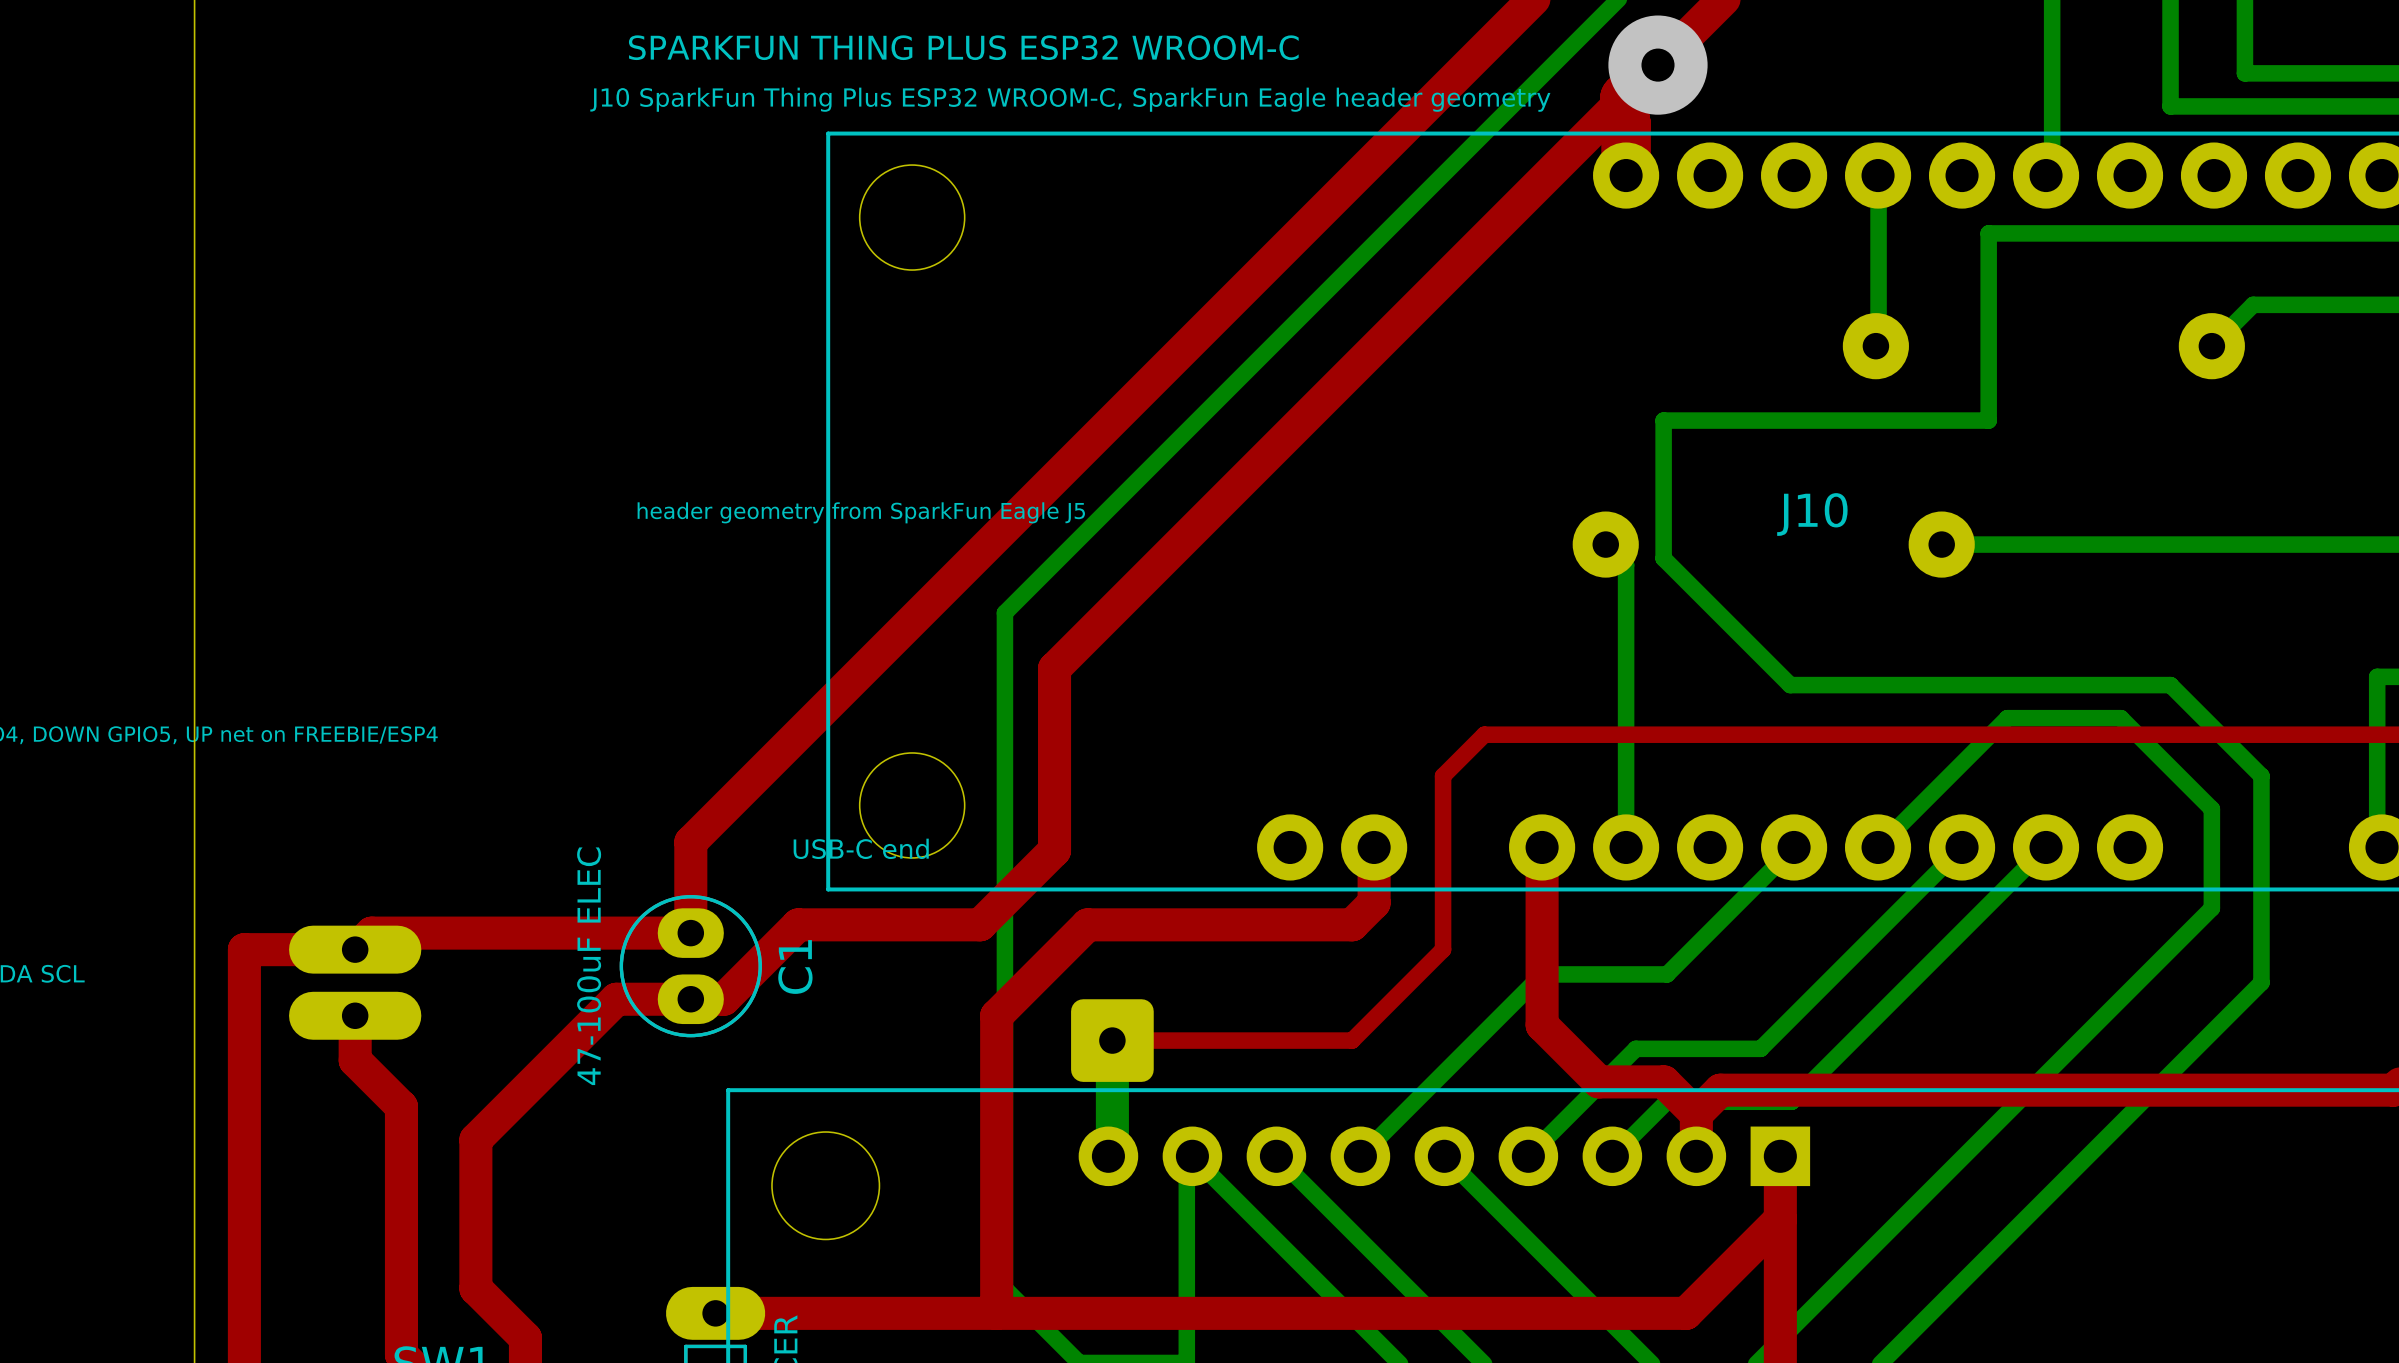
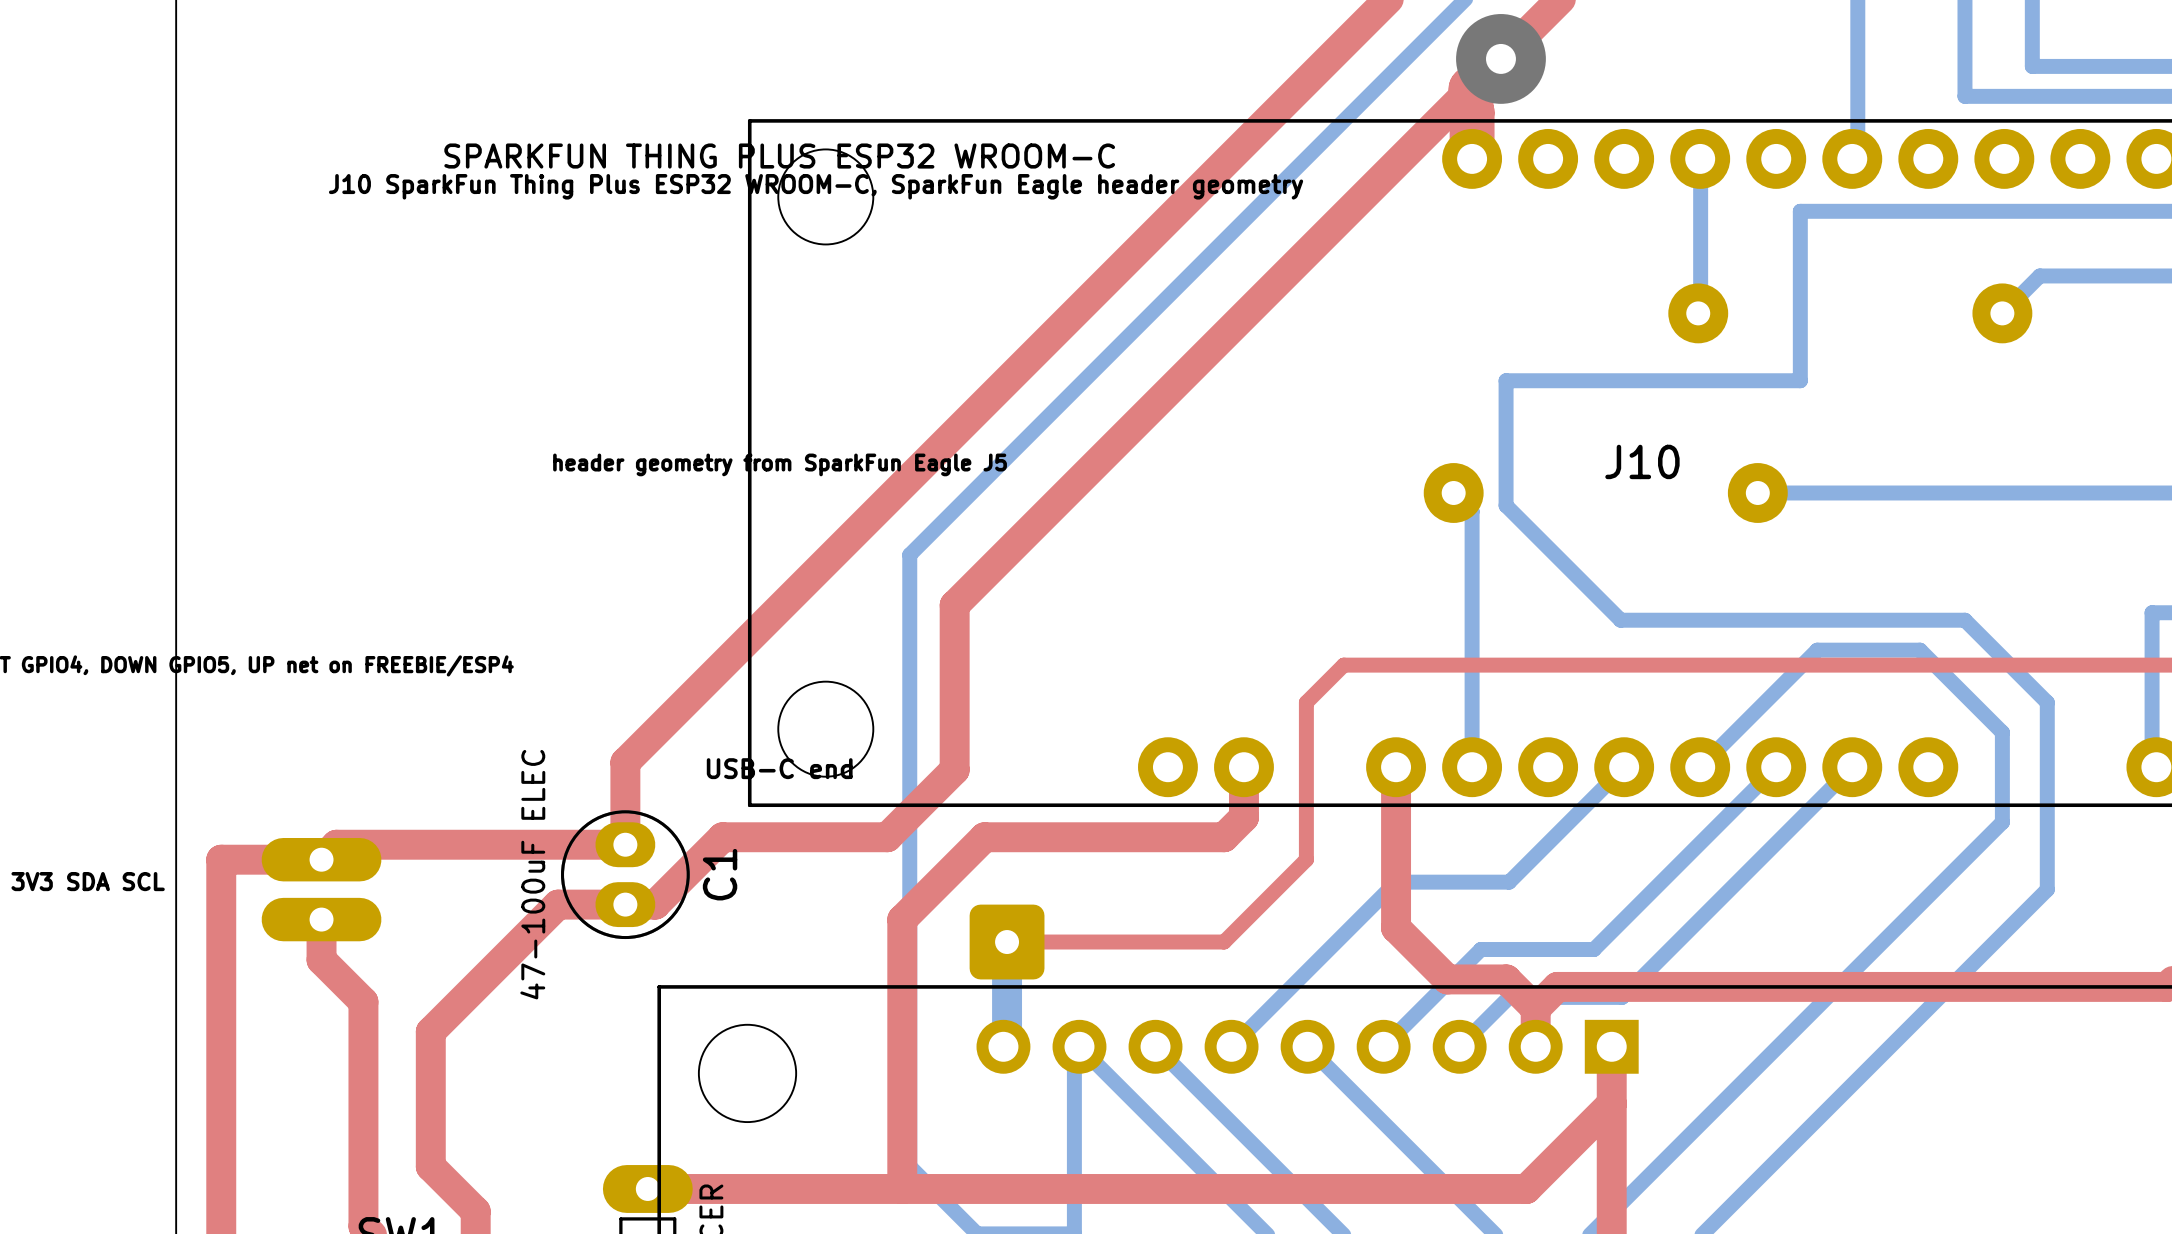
J10 text position: SPARKFUN THING PLUS ESP32 WROOM-C (963, 47) -> SPARKFUN THING PLUS ESP32 WROOM-C (779, 156)
text position: J10 SparkFun Thing Plus ESP32 WROOM-C, SparkFun Eagle header geometry (1070, 99) -> J10 SparkFun Thing Plus ESP32 WROOM-C, SparkFun Eagle header geometry (816, 186)

